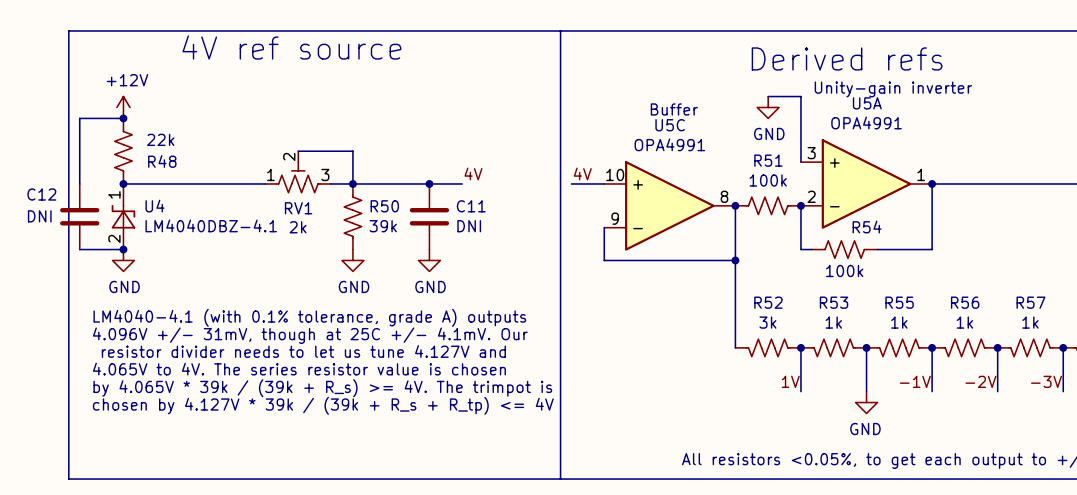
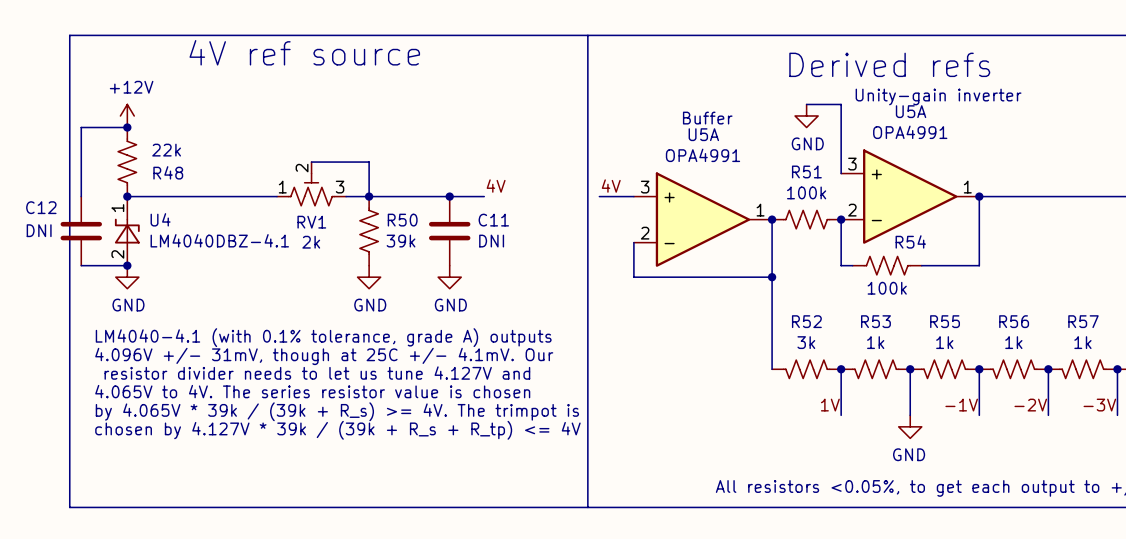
U5C name: U5C (670, 125) -> U5A (703, 134)
U5C pin number: 10 (615, 174) -> 3 (645, 187)
U5C pin number: 8 (724, 196) -> 1 (760, 210)
U5C pin number: 9 (615, 218) -> 2 (645, 233)

